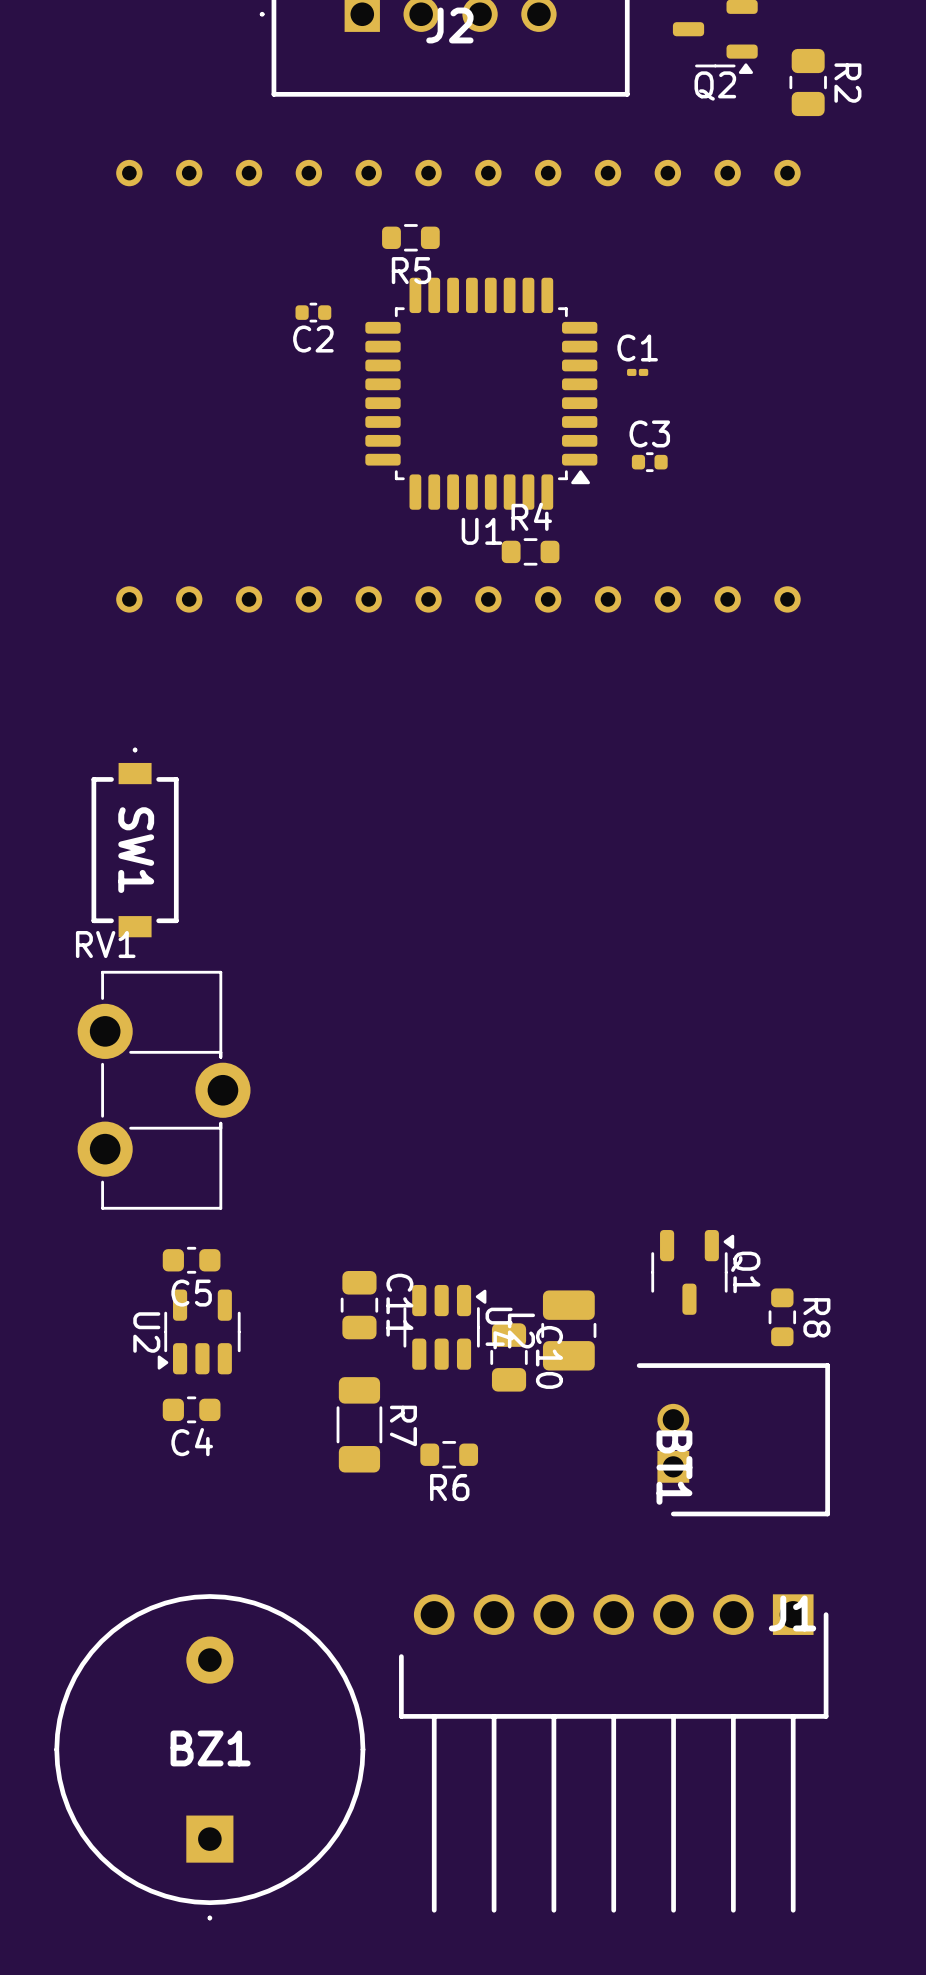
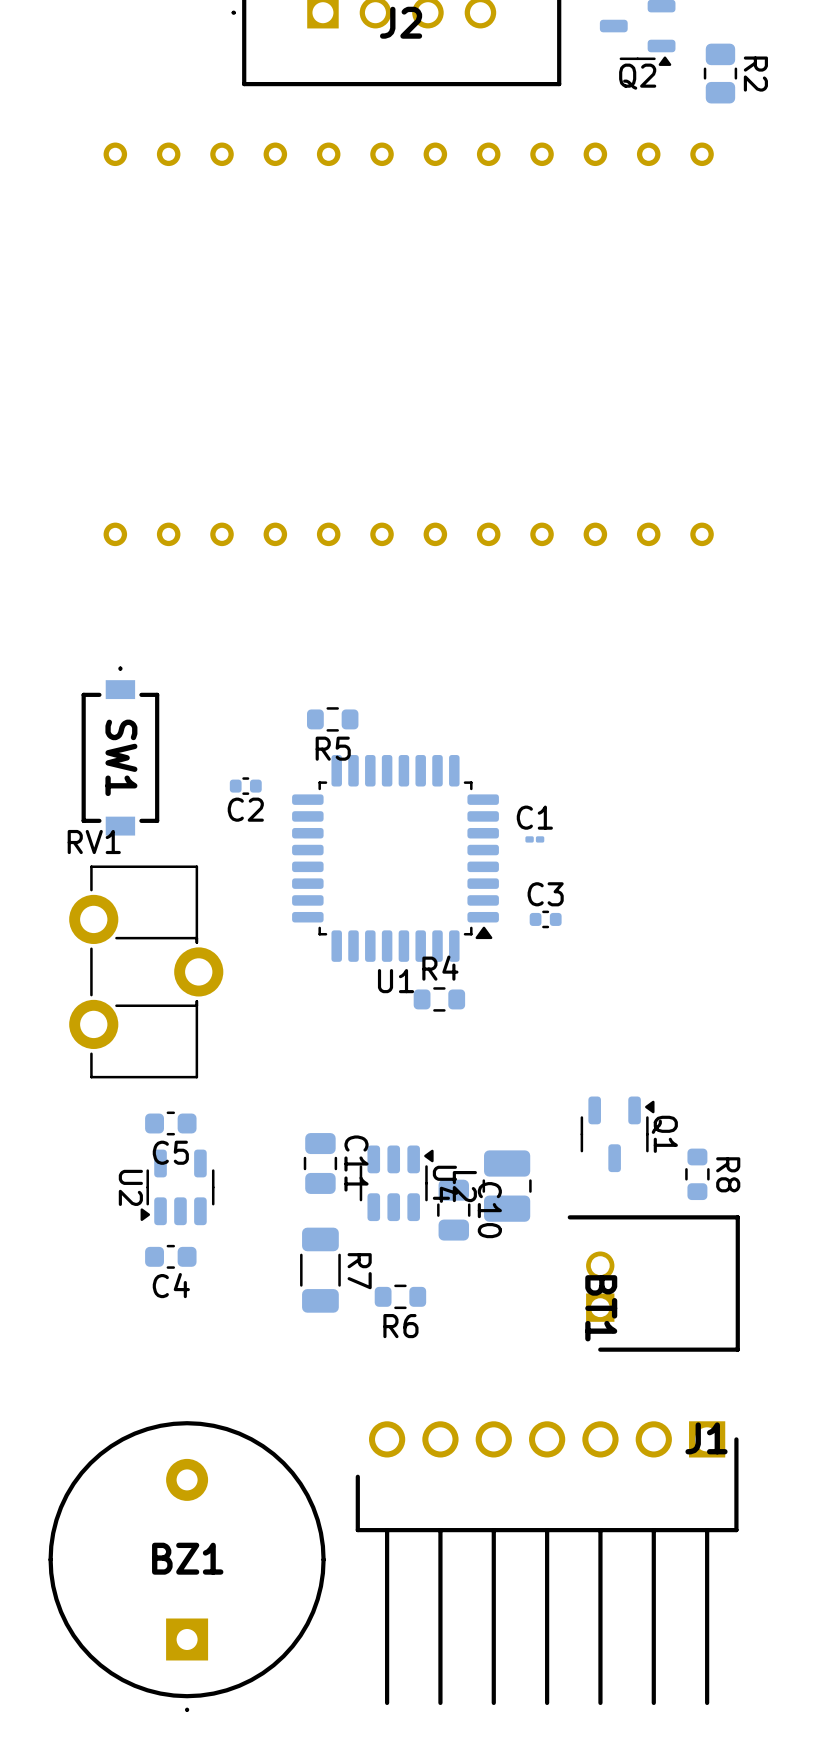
R5 position: (410, 237) -> (332, 719)
C2 position: (313, 312) -> (245, 786)
C1 position: (637, 372) -> (534, 839)
U1 position: (481, 393) -> (395, 858)
C3 position: (649, 462) -> (545, 919)
R4 position: (530, 551) -> (439, 999)

